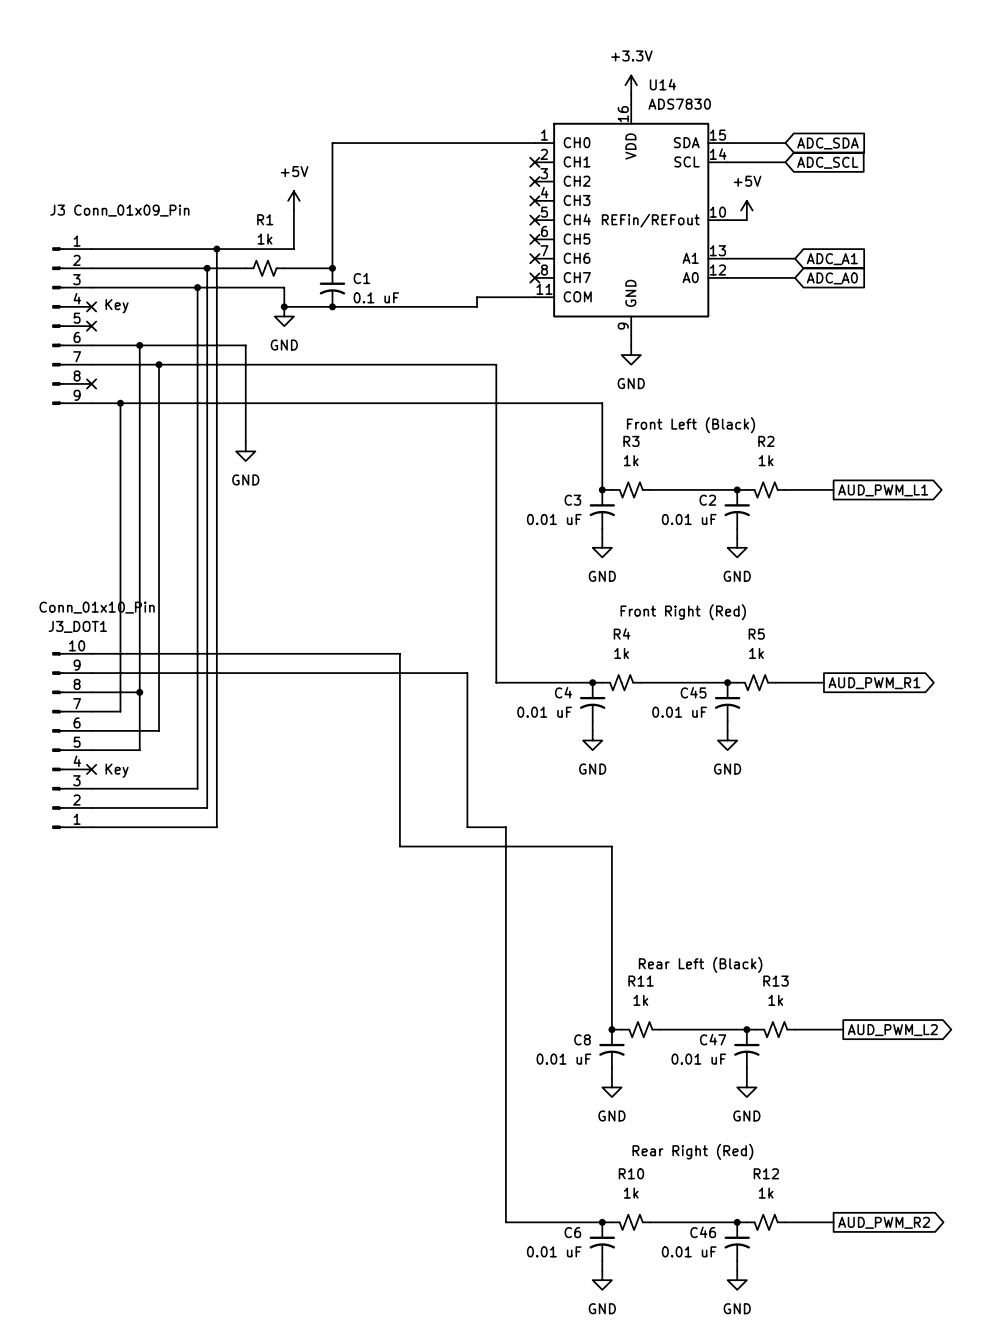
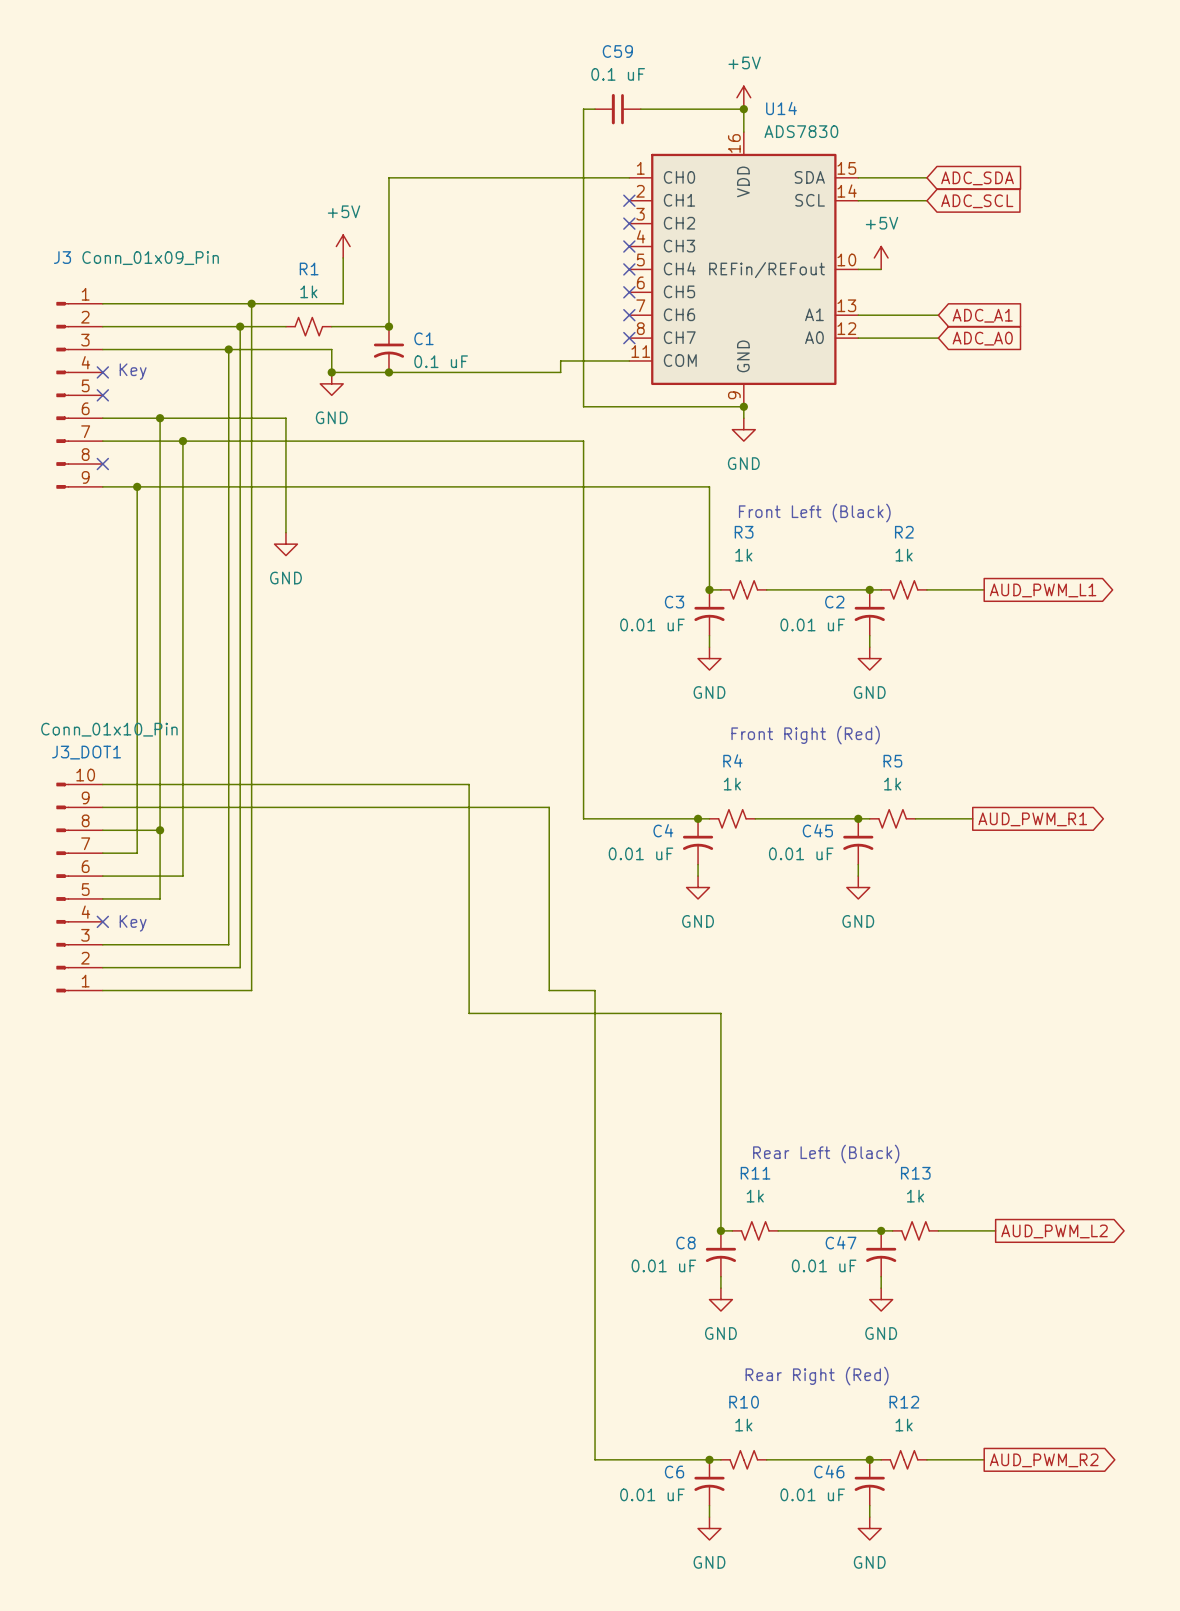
power symbol: none -> +5V (743, 97)
wire: none -> (595, 109) (583, 109) (583, 406) (743, 406)
C59: none -> 0.1 uF (617, 109)
wire: none -> (640, 109) (743, 109) (743, 120)
power symbol: +3.3V (631, 85) -> none
junction: none -> (743, 109)
junction: none -> (743, 406)

